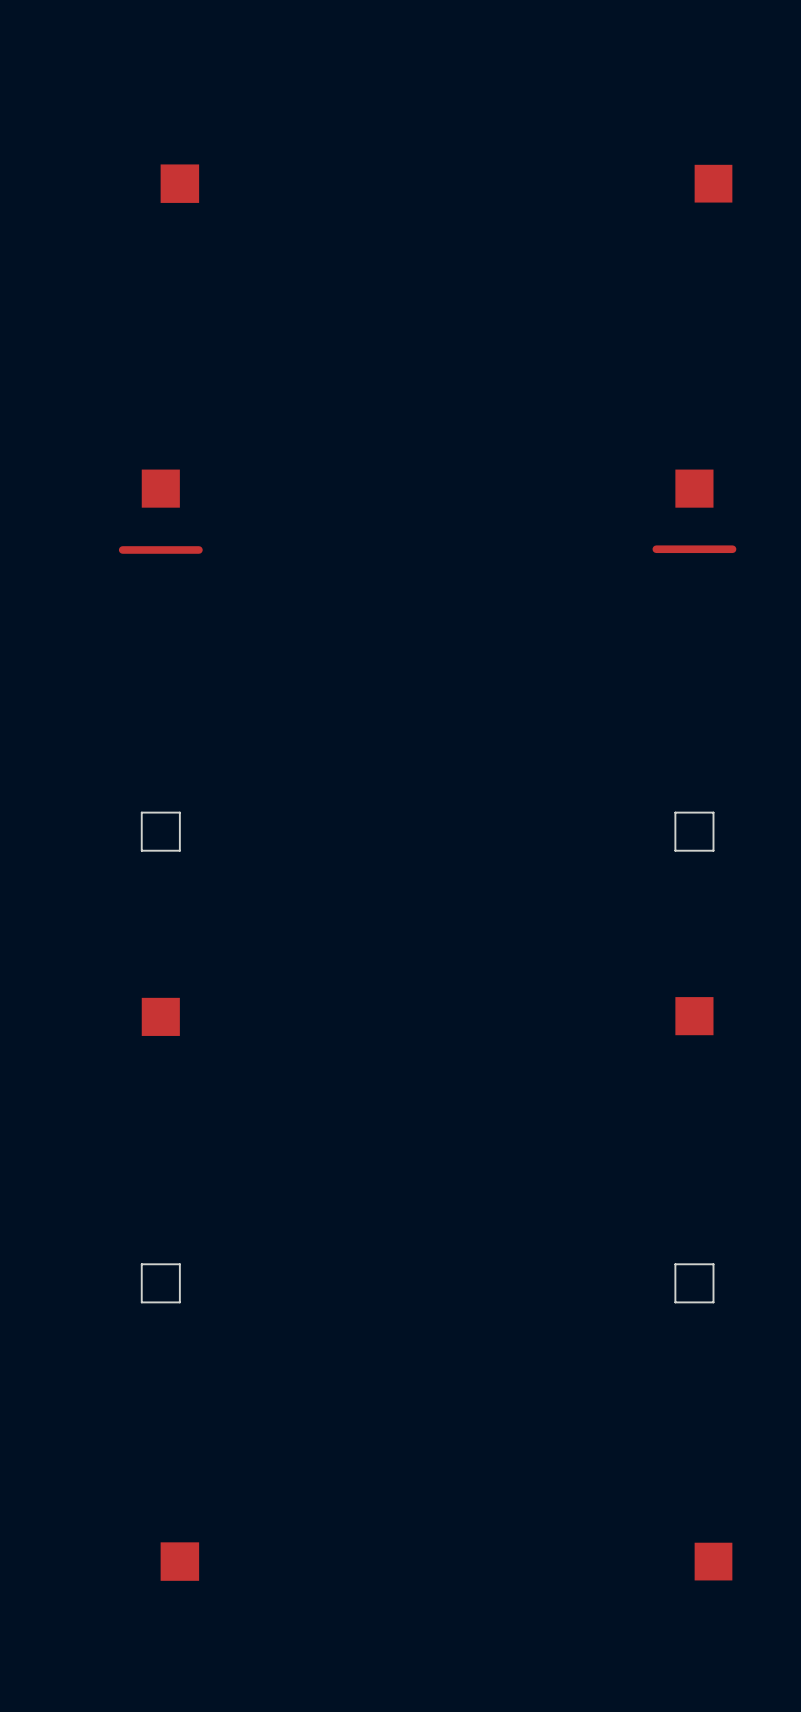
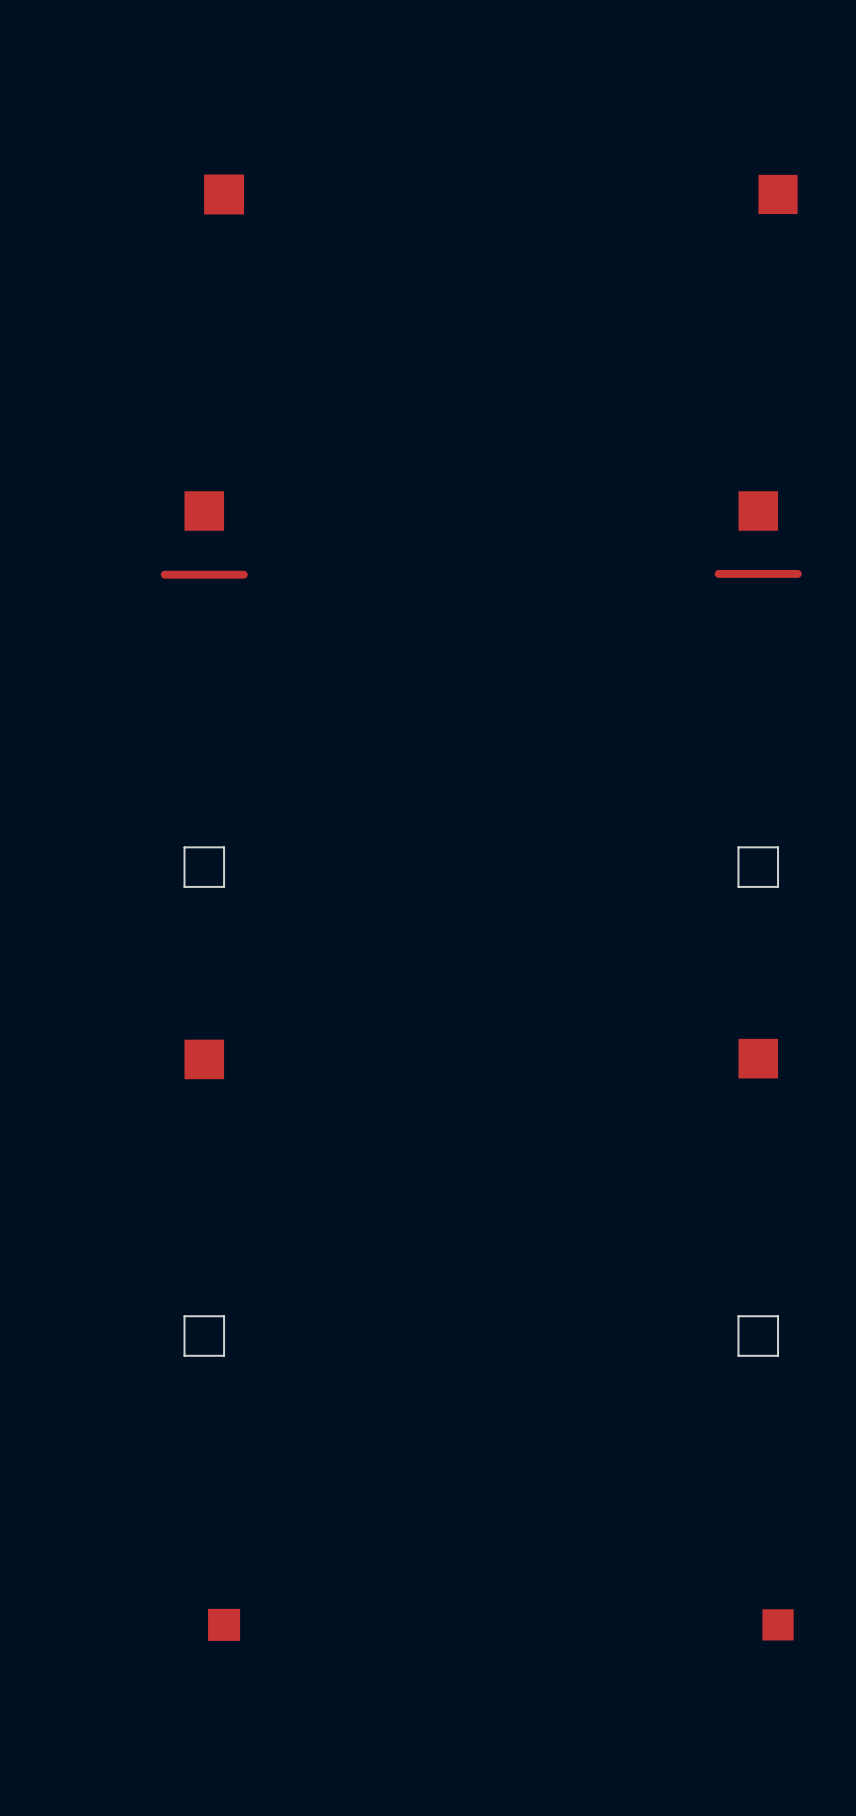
part footprint: [160, 1542, 200, 1581] -> [208, 1608, 241, 1641]
part footprint: [694, 1542, 733, 1581] -> [762, 1609, 794, 1641]

